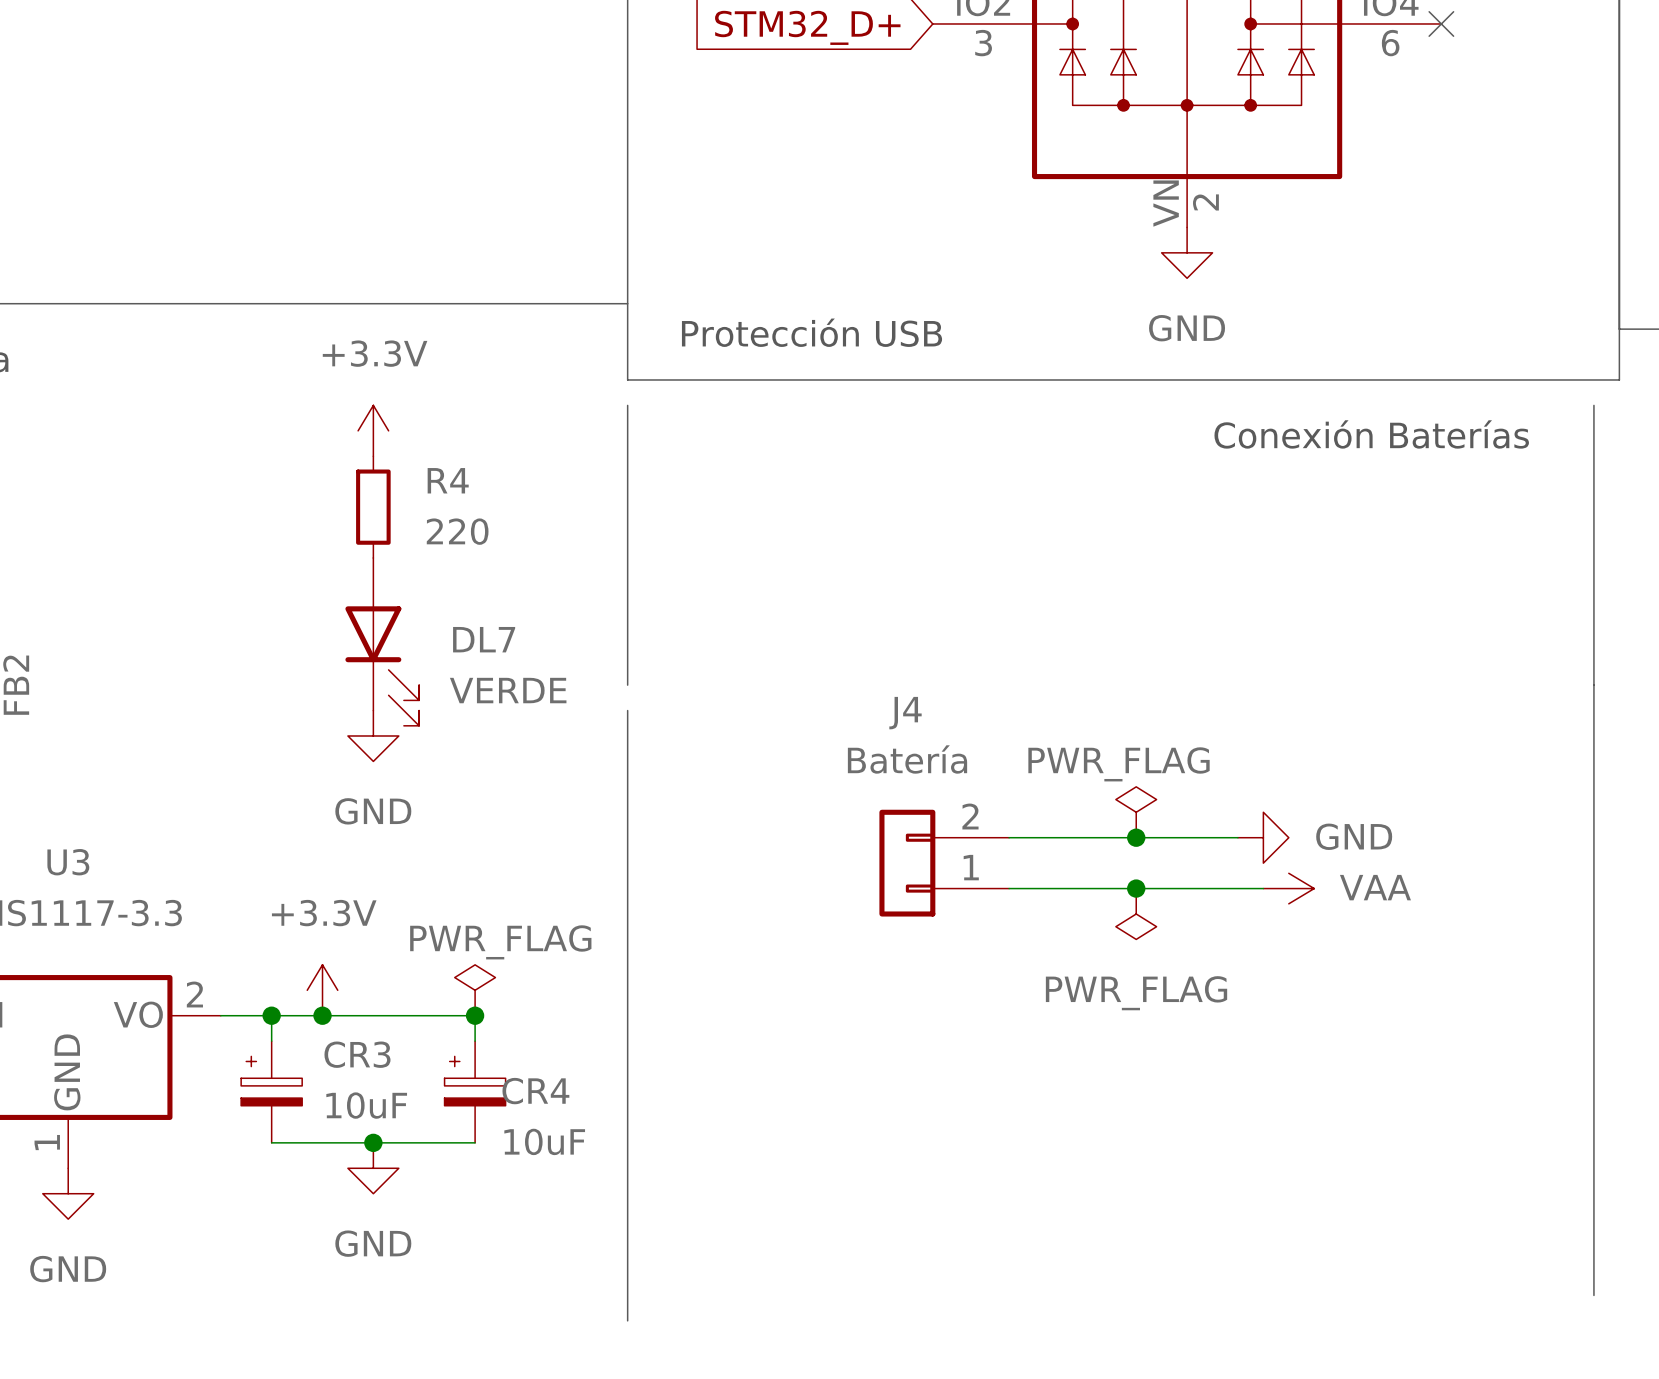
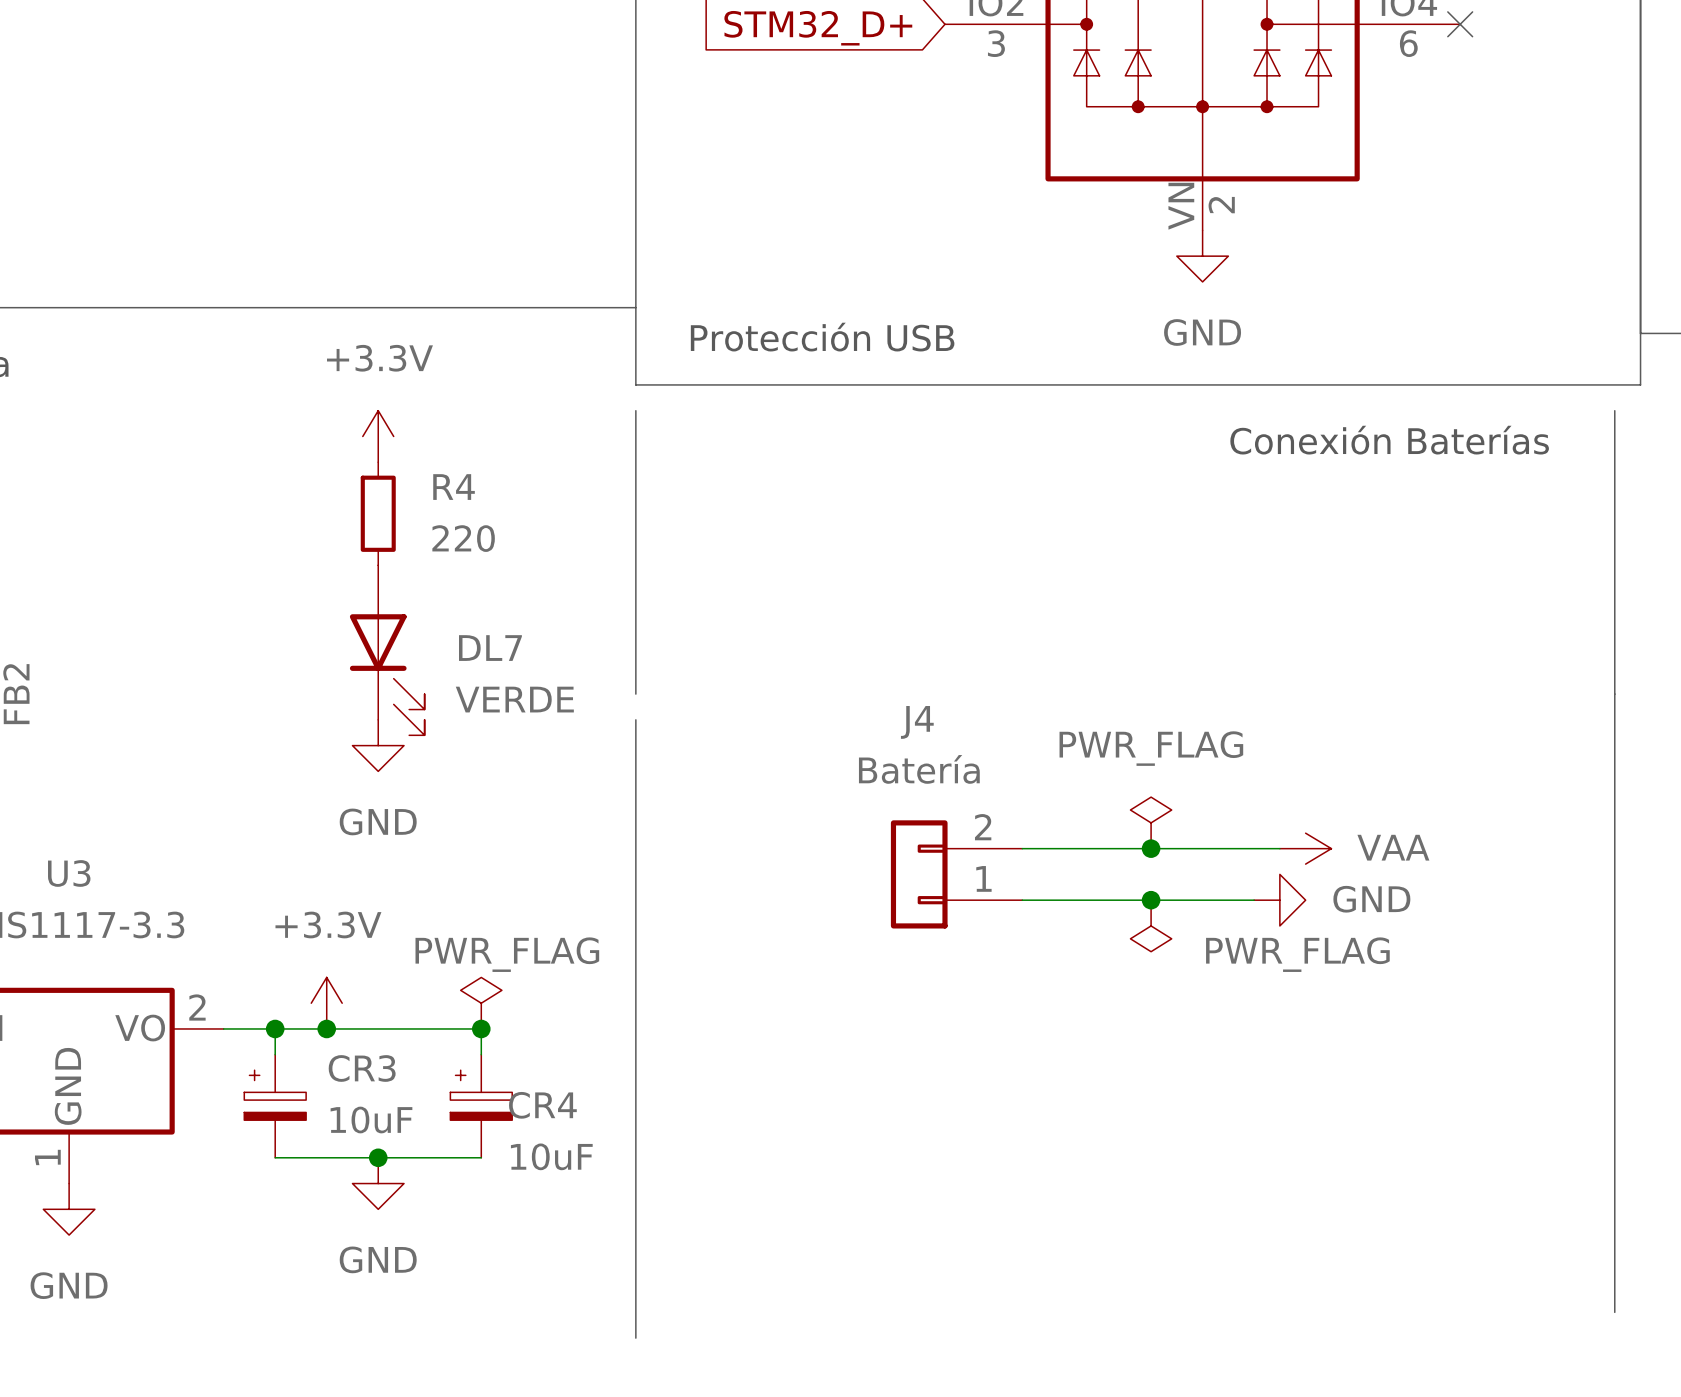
power symbol text position: PWR_FLAG (1119, 764) -> PWR_FLAG (1151, 748)
power symbol position: GND (1263, 837) -> GND (1279, 900)
power symbol position: VAA (1288, 888) -> VAA (1305, 848)
power symbol text position: PWR_FLAG (1136, 993) -> PWR_FLAG (1297, 954)

